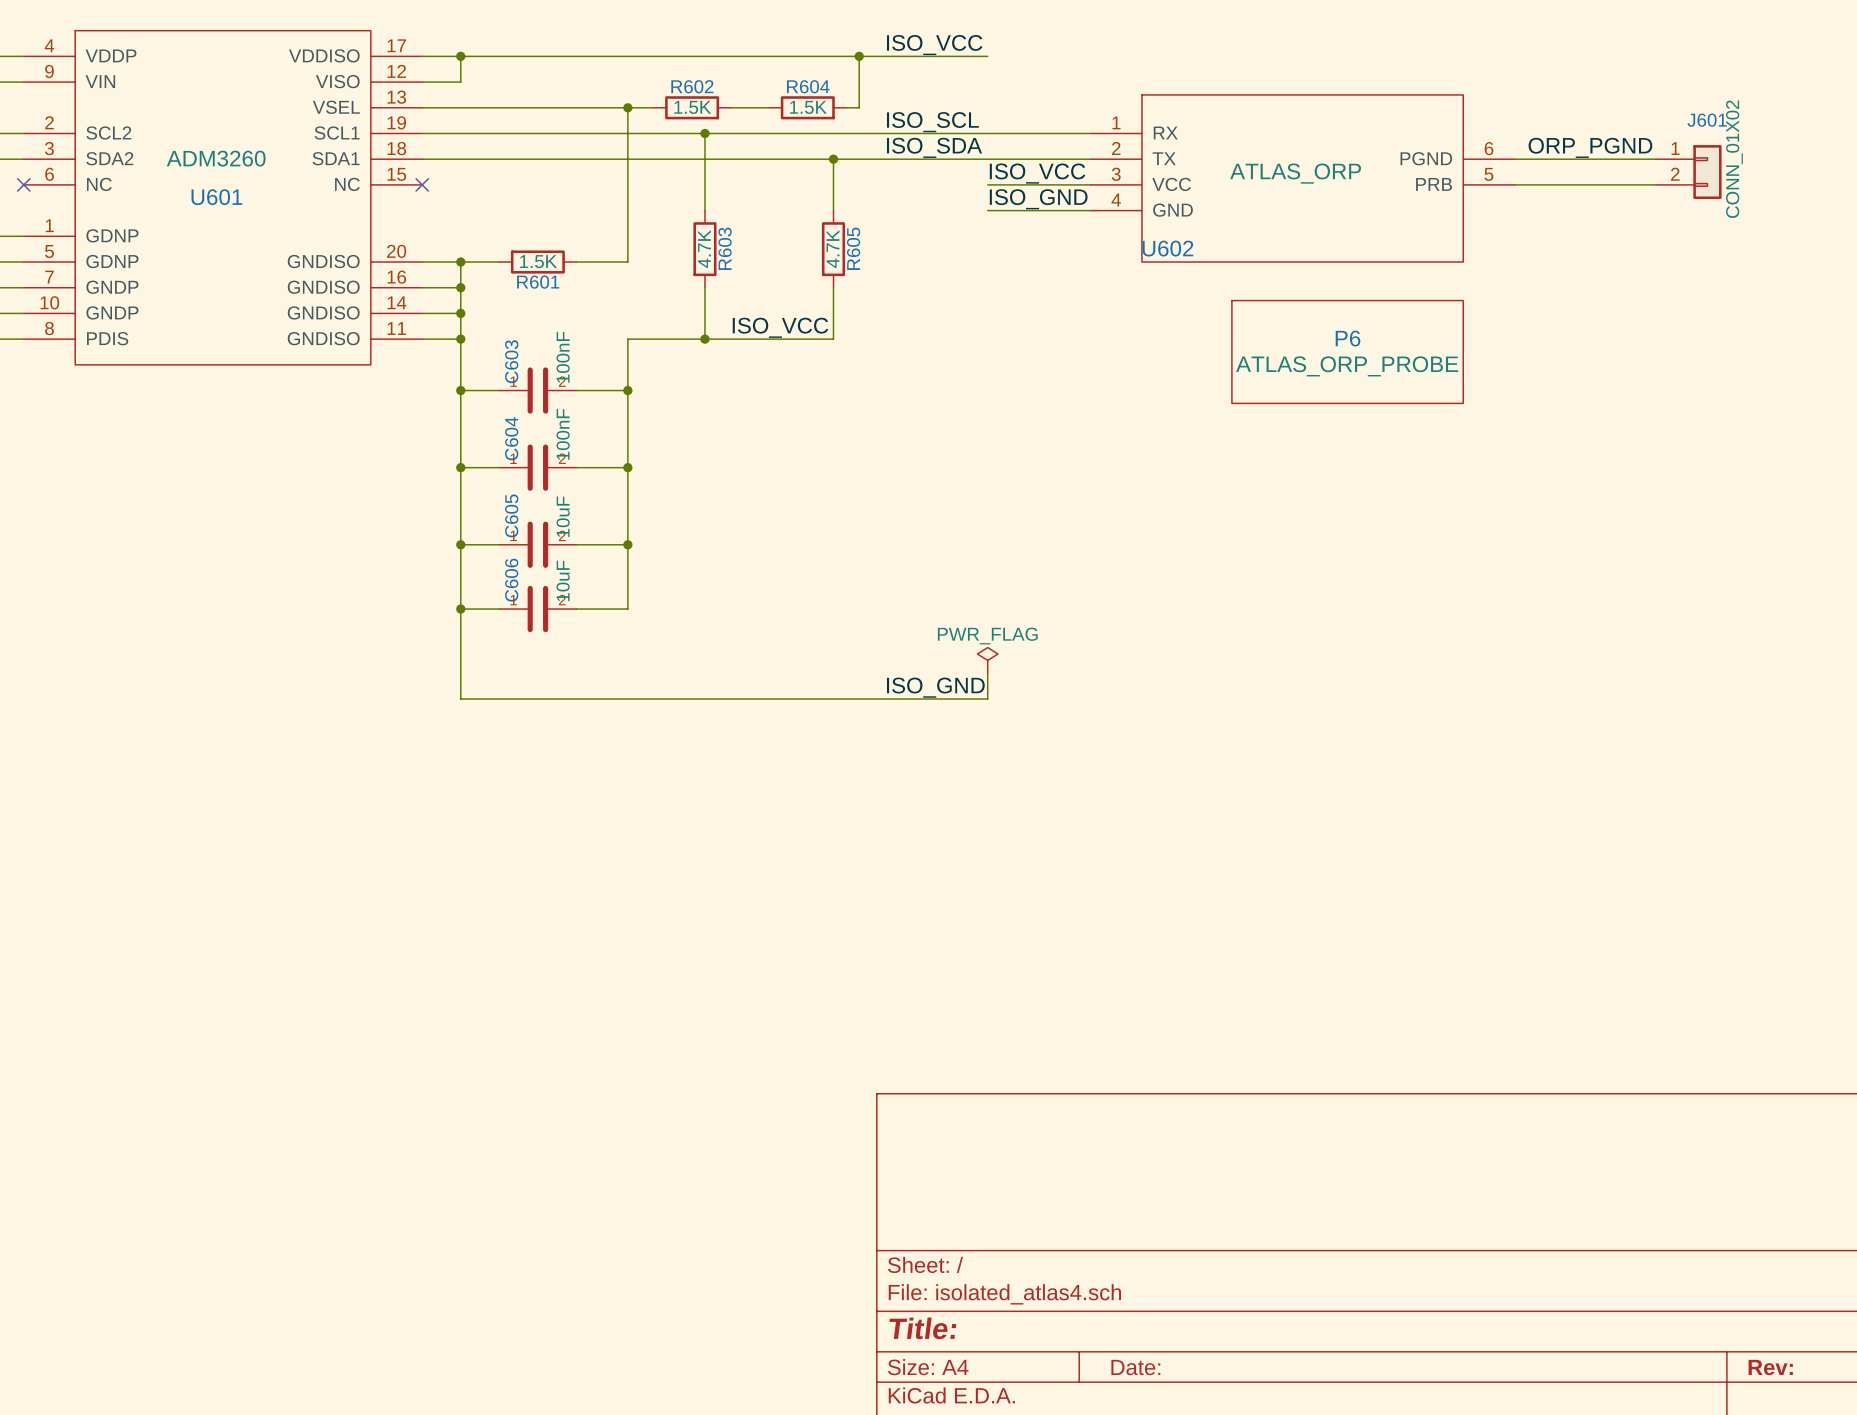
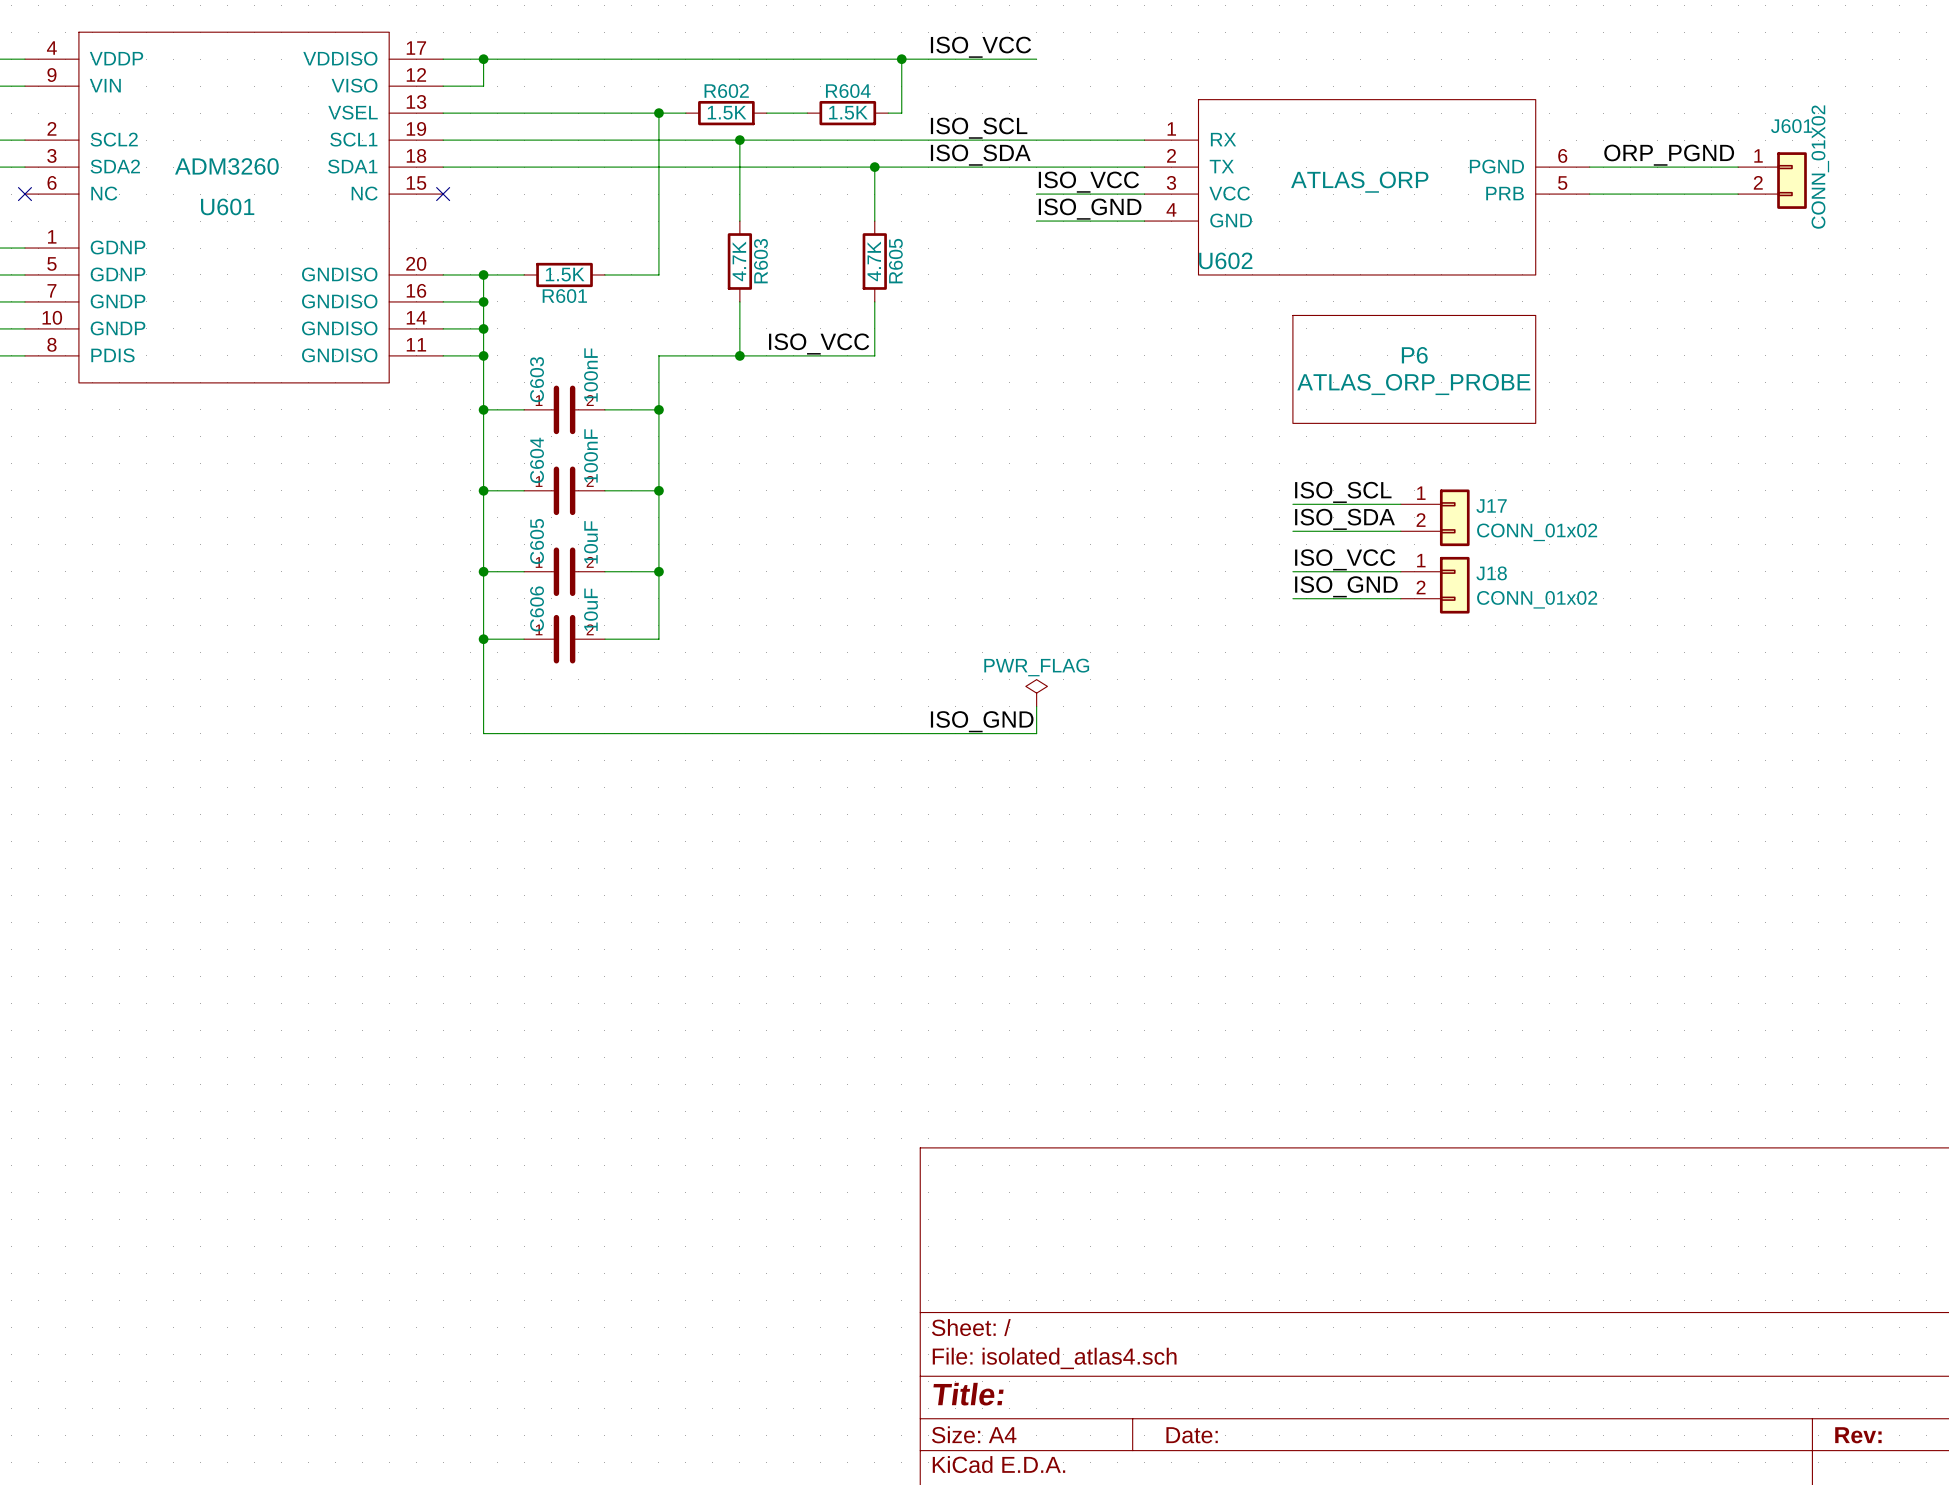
label: none -> ISO_SCL (1343, 492)
wire: none -> (1292, 504) (1400, 504)
J17: none -> CONN_01x02 (1435, 517)
label: none -> ISO_SDA (1344, 519)
wire: none -> (1292, 531) (1400, 531)
label: none -> ISO_VCC (1345, 559)
wire: none -> (1292, 571) (1400, 571)
J18: none -> CONN_01x02 (1435, 585)
label: none -> ISO_GND (1346, 586)
wire: none -> (1292, 598) (1400, 598)

